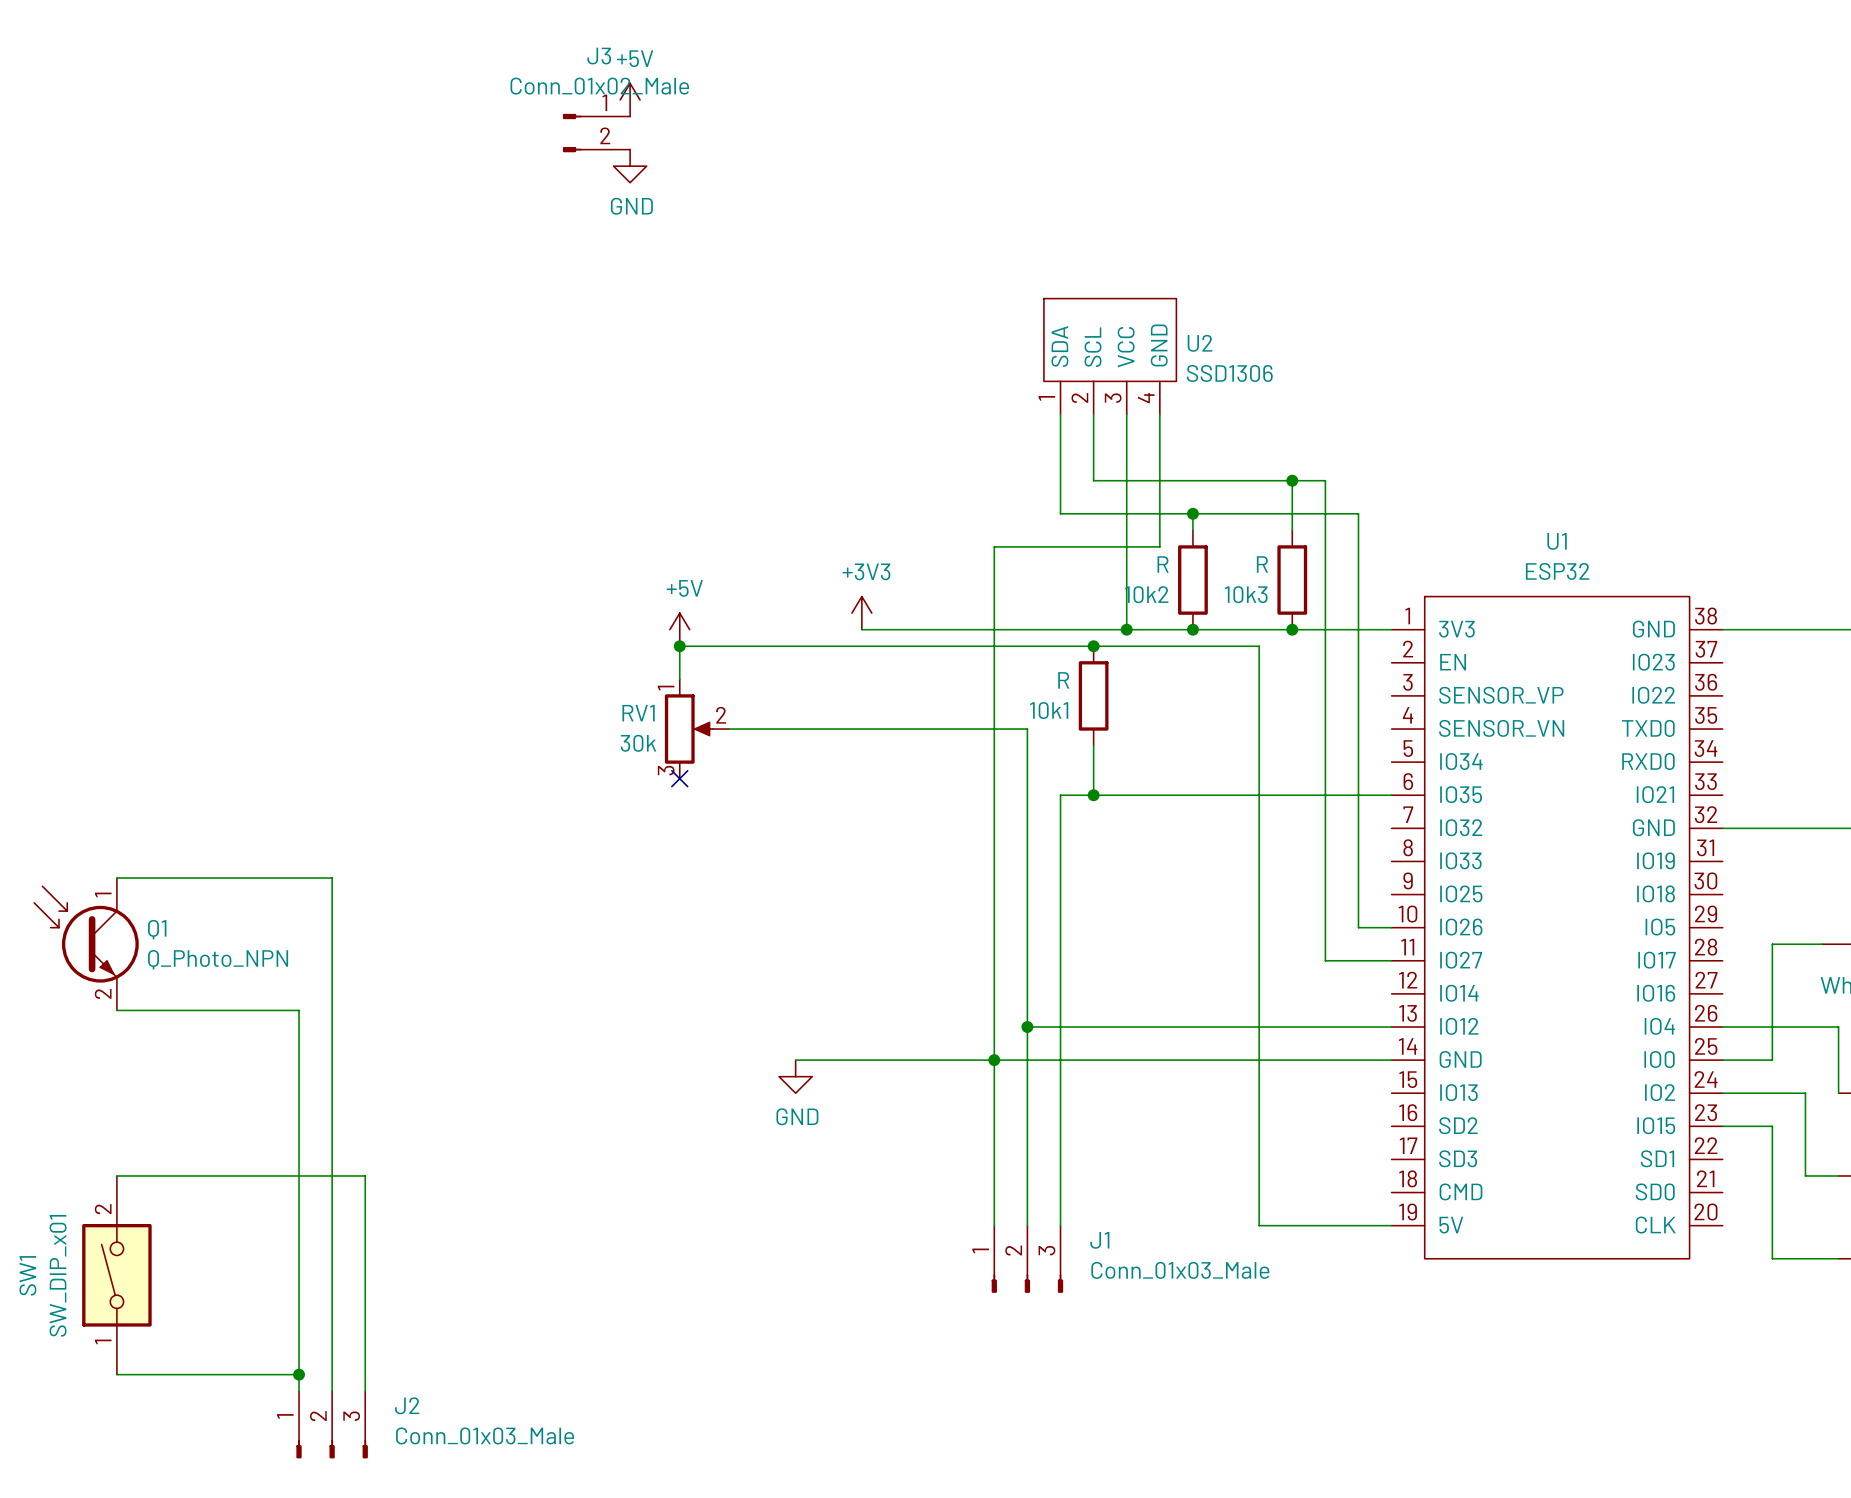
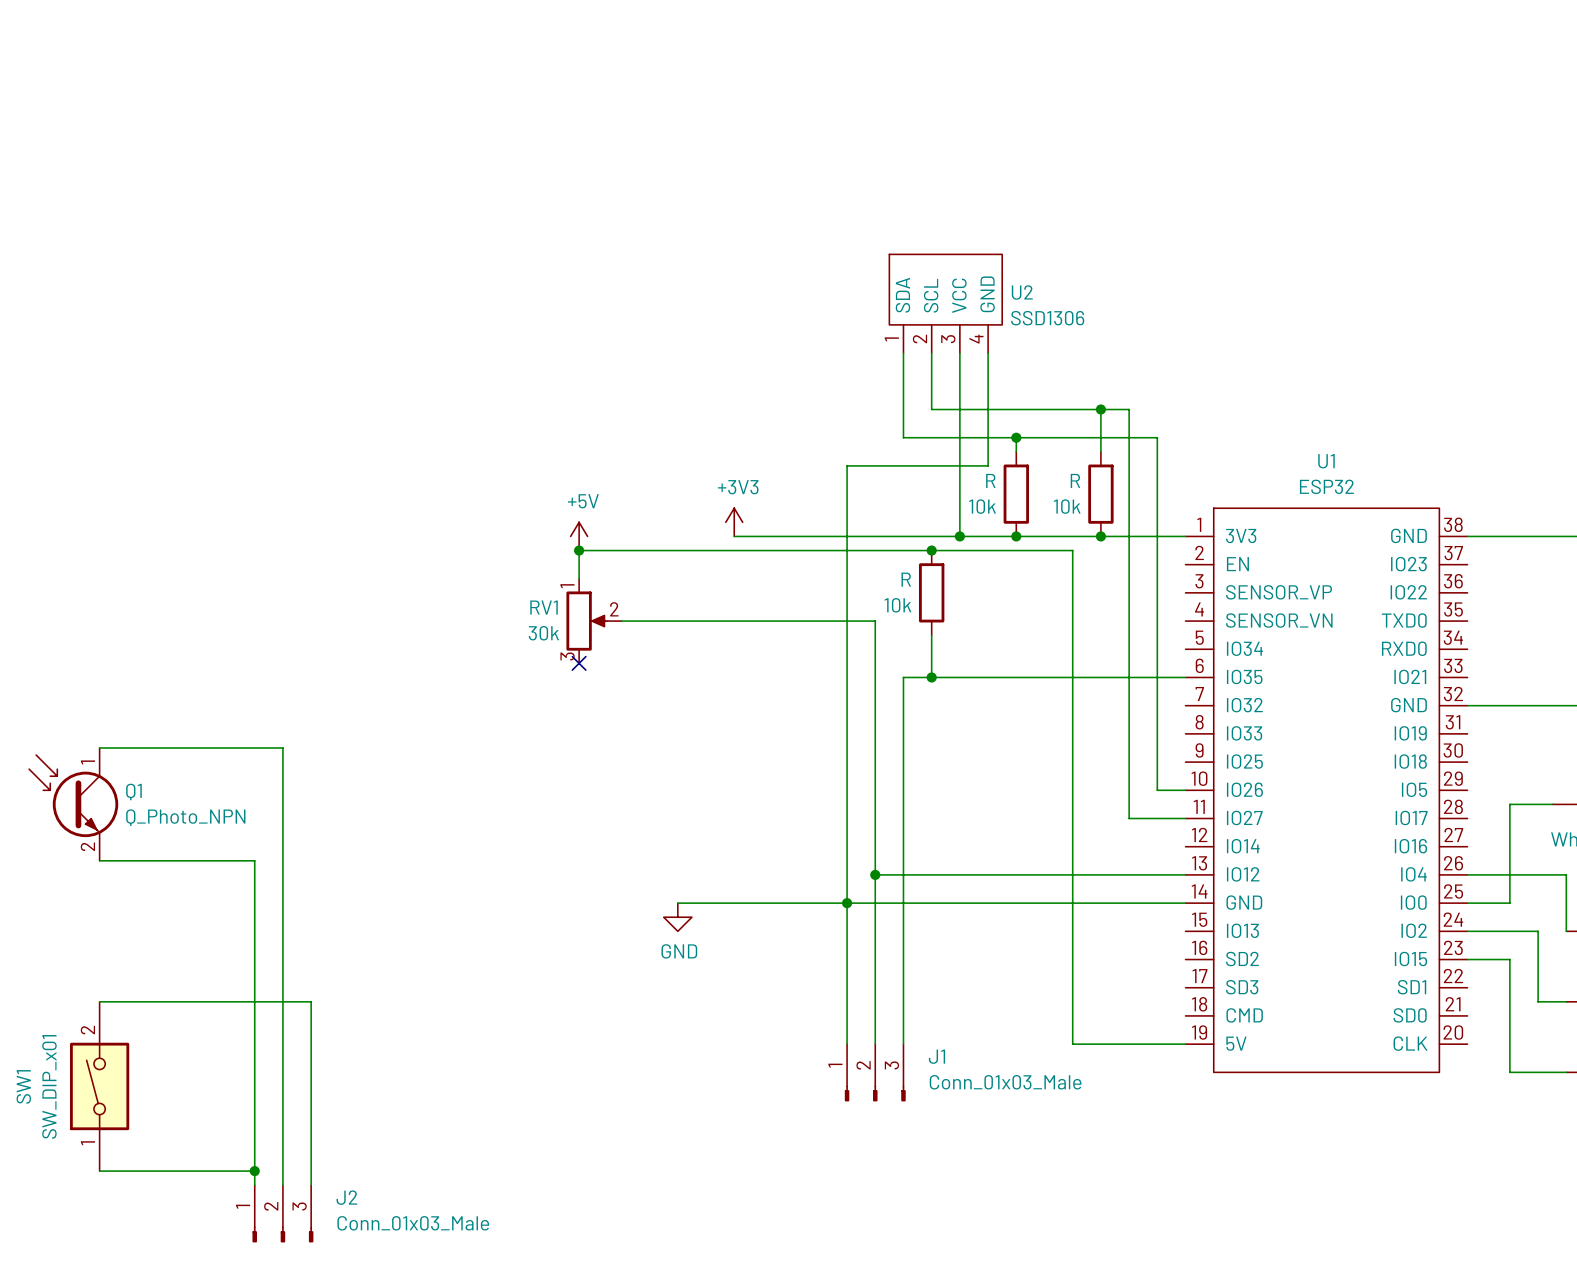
power symbol: +5V (630, 99) -> none
J3: Conn_01x02_Male (596, 133) -> none
power symbol: GND (630, 166) -> none
10k2 name: 10k2 (1146, 594) -> 10k (982, 506)
10k3 name: 10k3 (1246, 594) -> 10k (1067, 506)
10k1 name: 10k1 (1049, 710) -> 10k (897, 605)

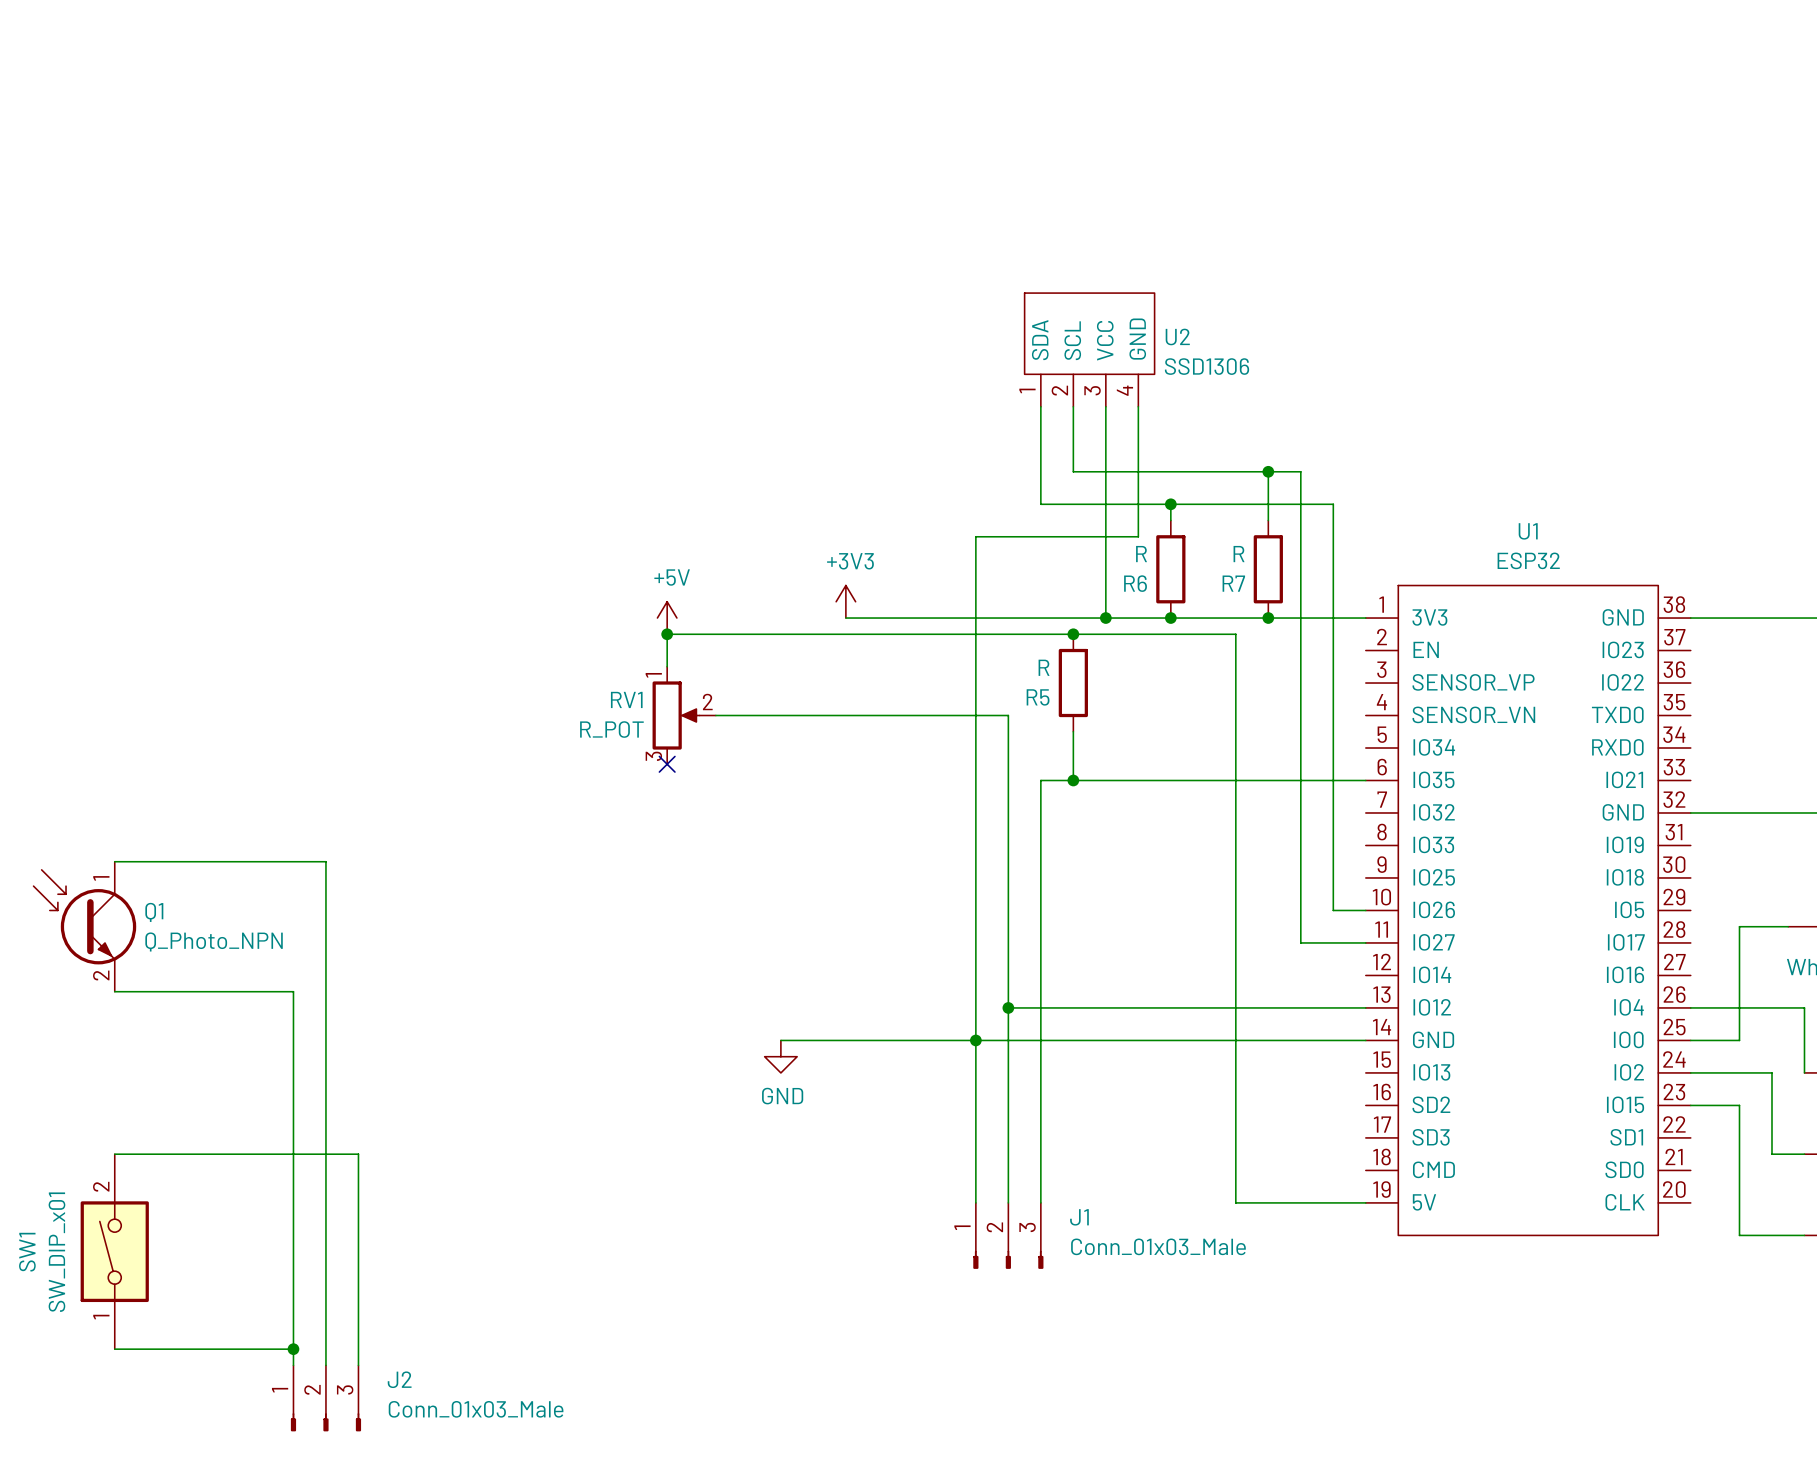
10k name: 10k (982, 506) -> R6 (1135, 583)
10k name: 10k (1067, 506) -> R7 (1233, 583)
10k name: 10k (897, 605) -> R5 (1038, 697)
RV1 value: 30k (543, 633) -> R_POT (611, 729)

